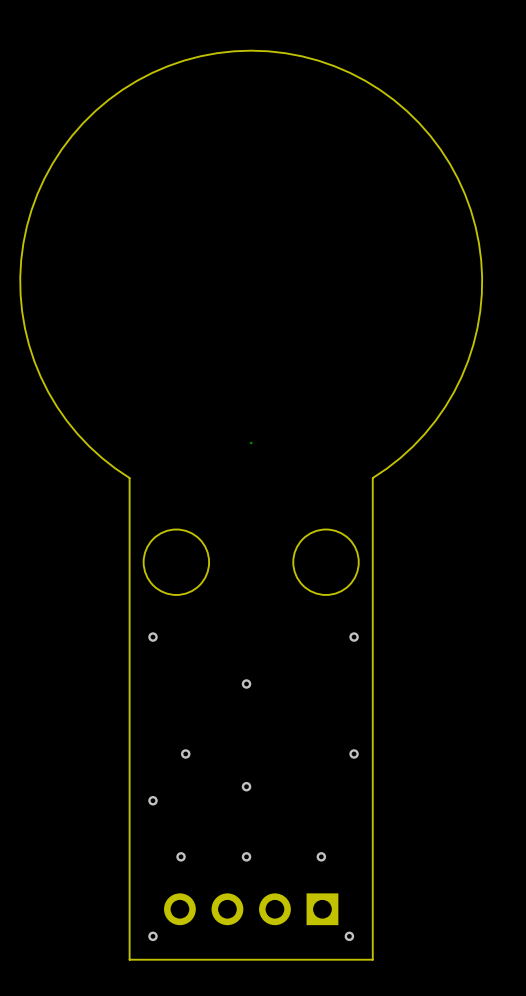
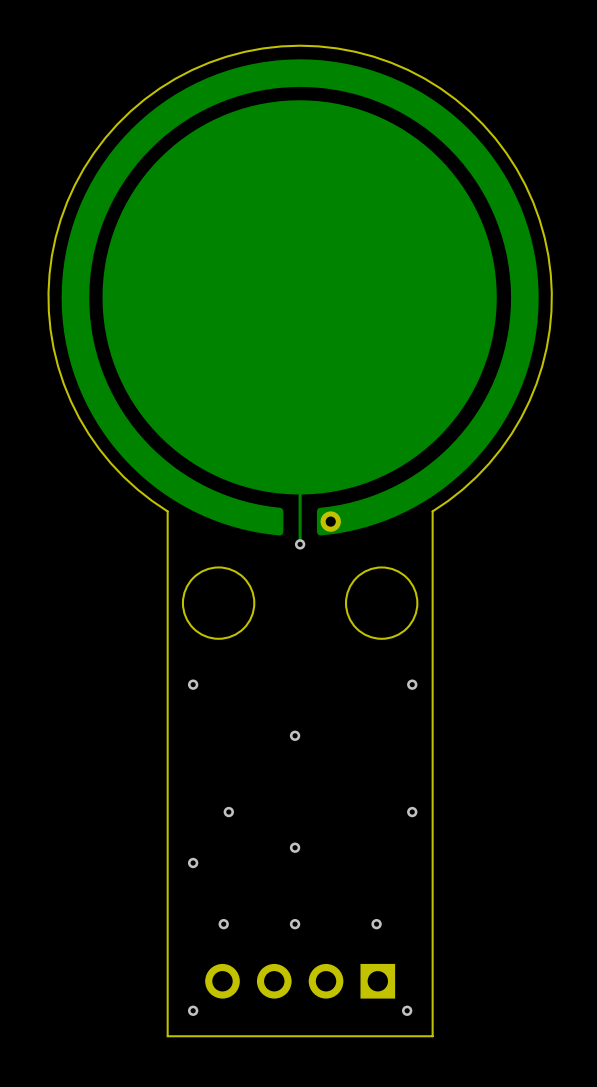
part: none -> (300, 297)
track: none -> (300, 473) (300, 544)
via: none -> (300, 544)

